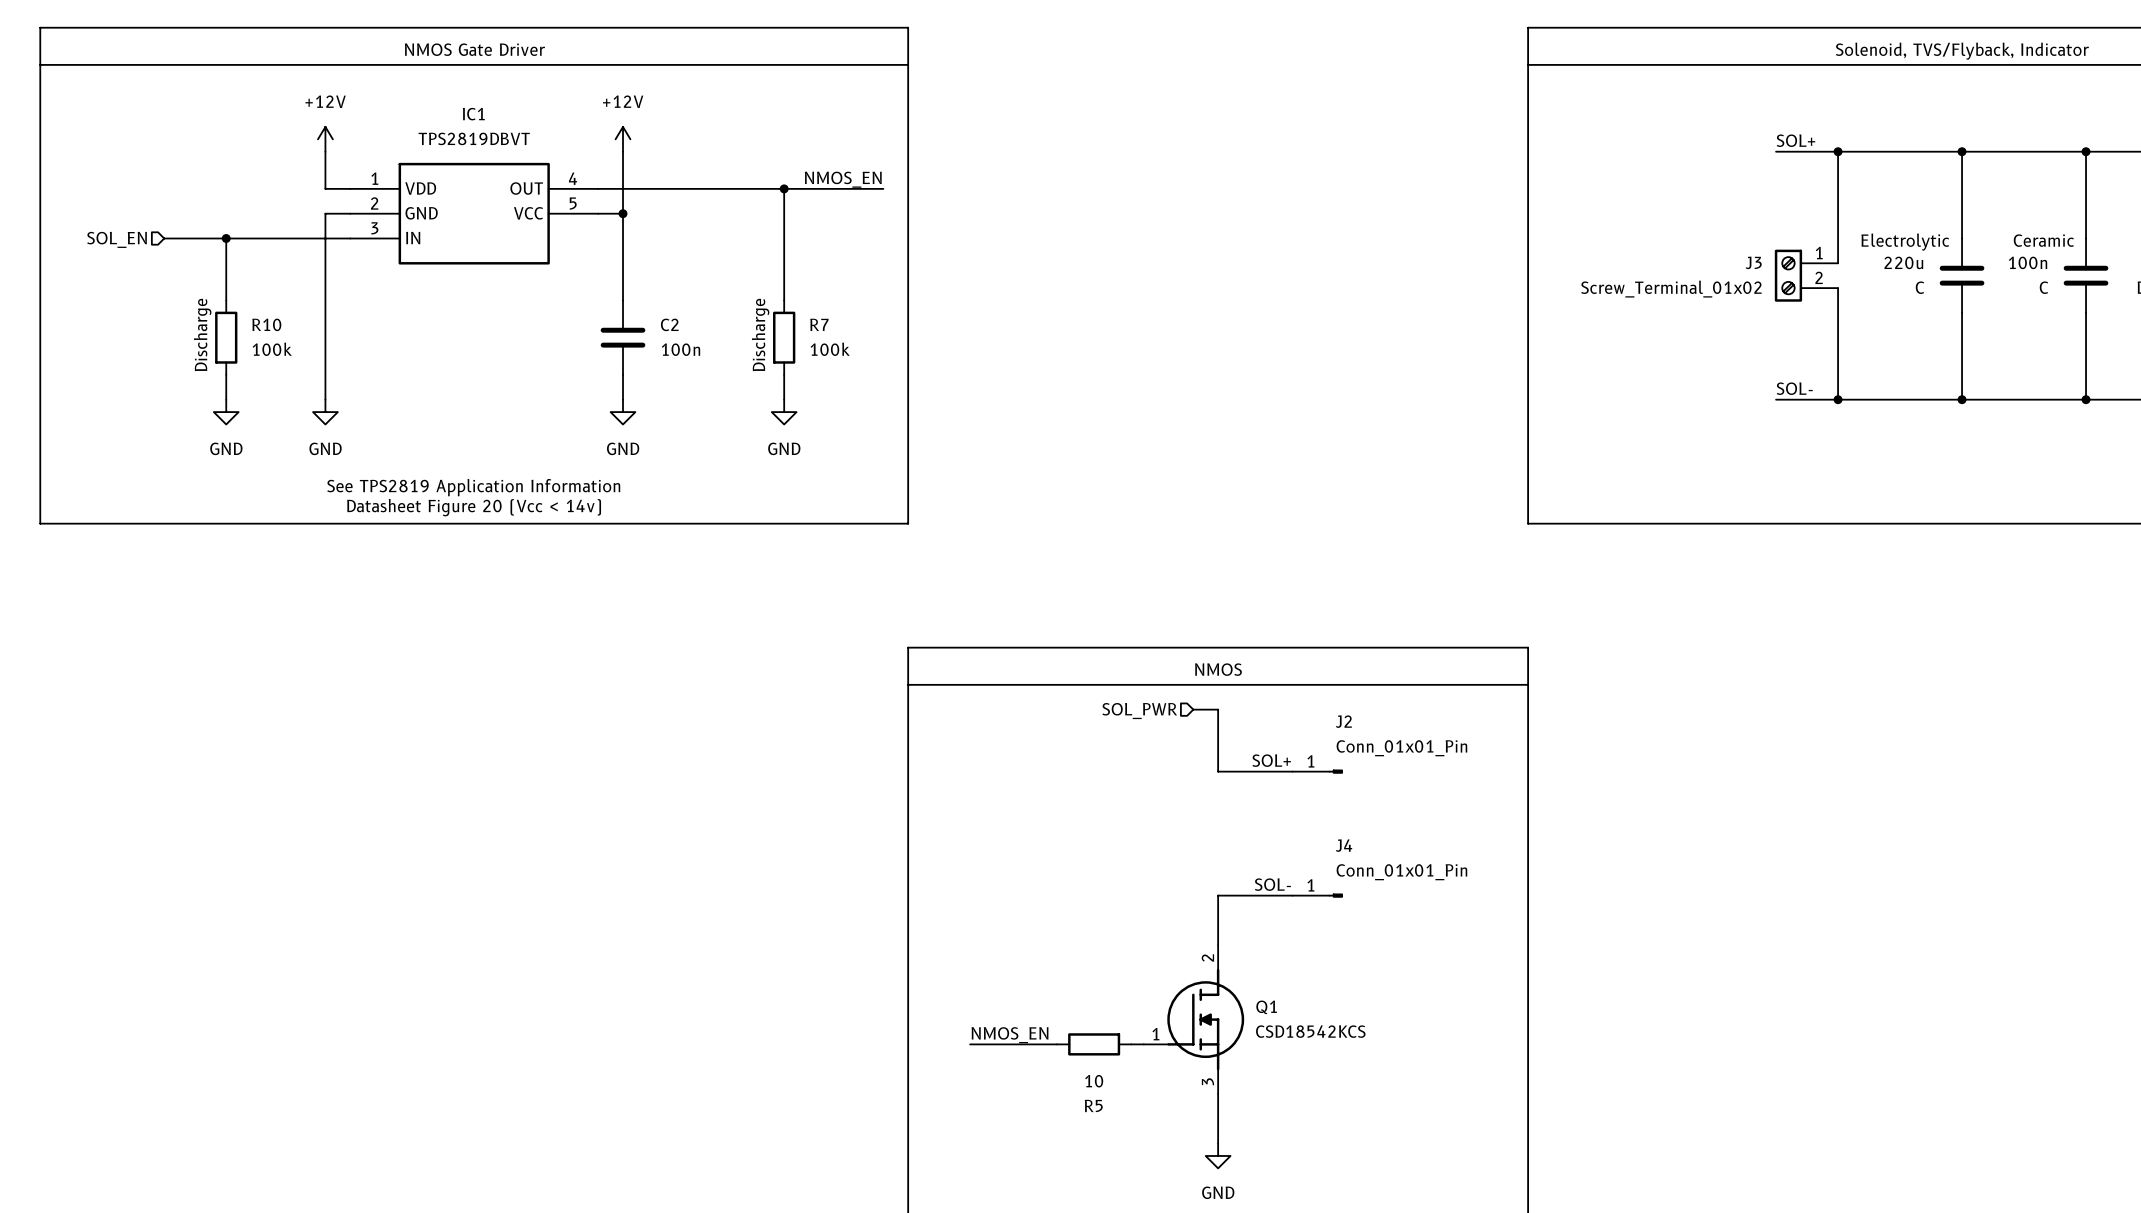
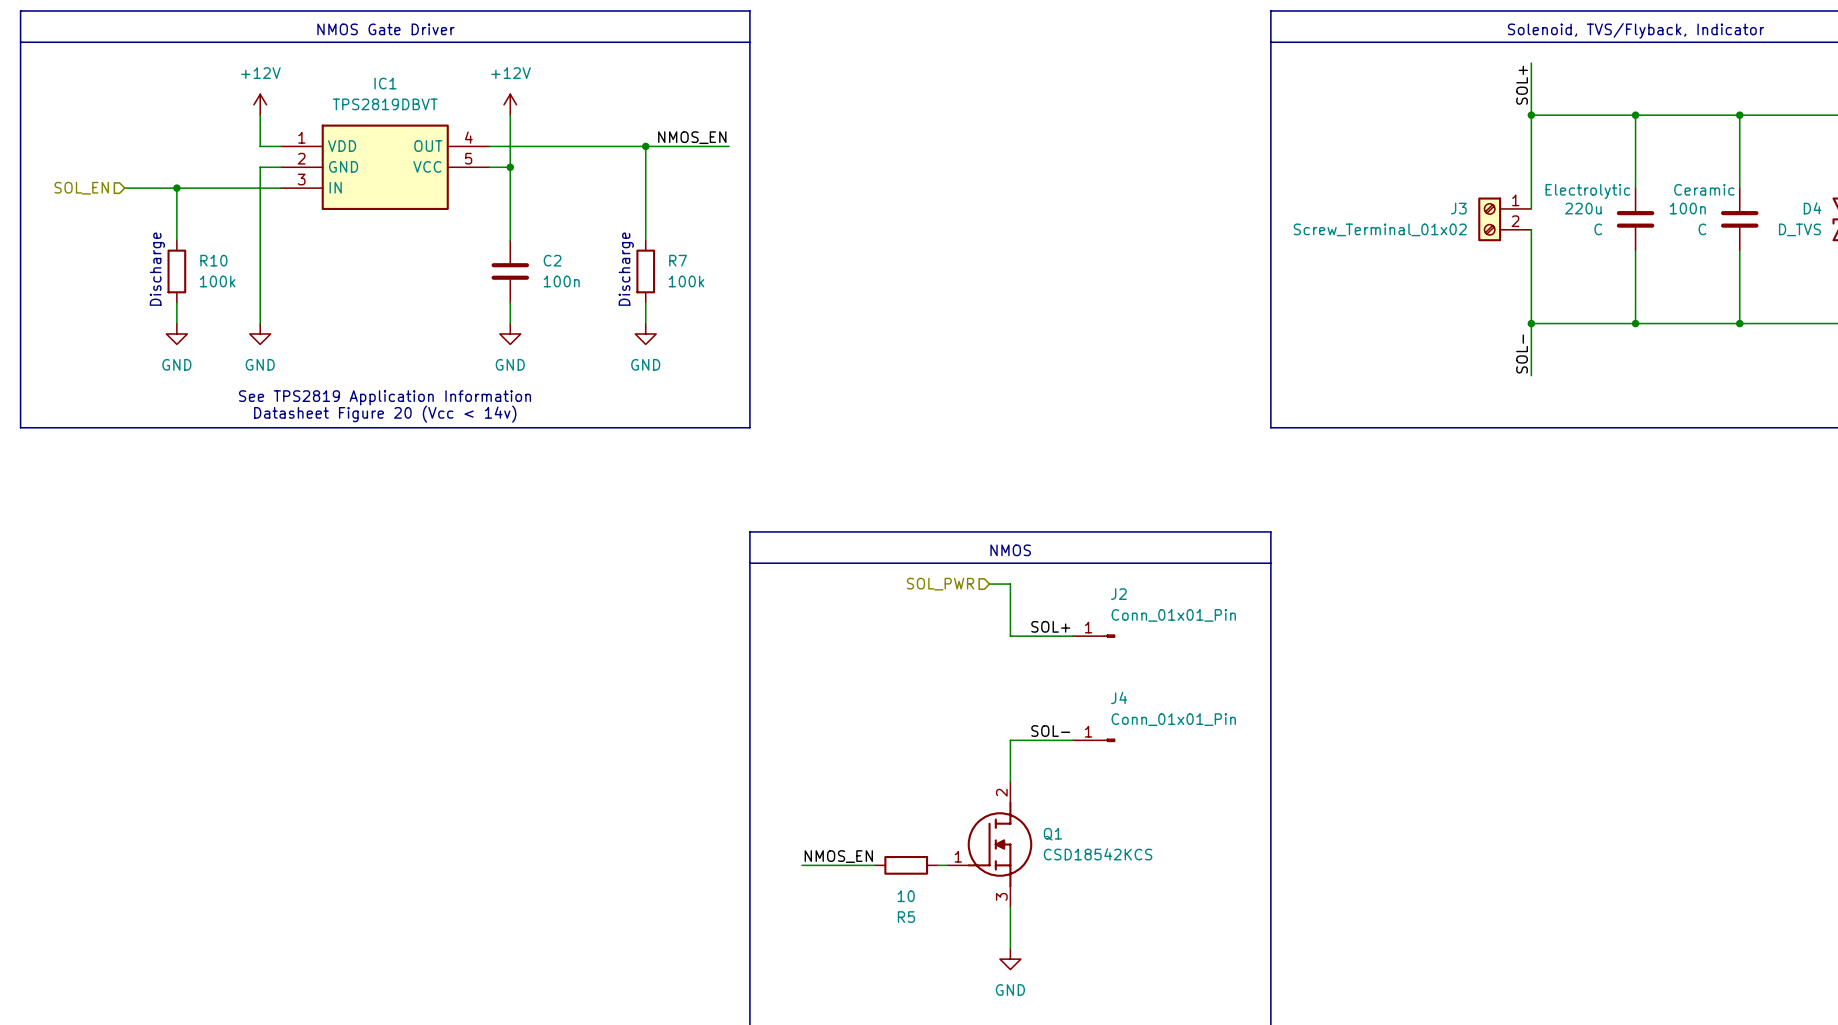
label rotation: 0° (1795, 140) -> 90° counterclockwise (1522, 85)
wire: (1776, 151) (1838, 151) -> (1531, 63) (1531, 115)
label rotation: 0° (1794, 388) -> 90° counterclockwise (1522, 354)
wire: (1776, 399) (1838, 399) -> (1531, 375) (1531, 323)

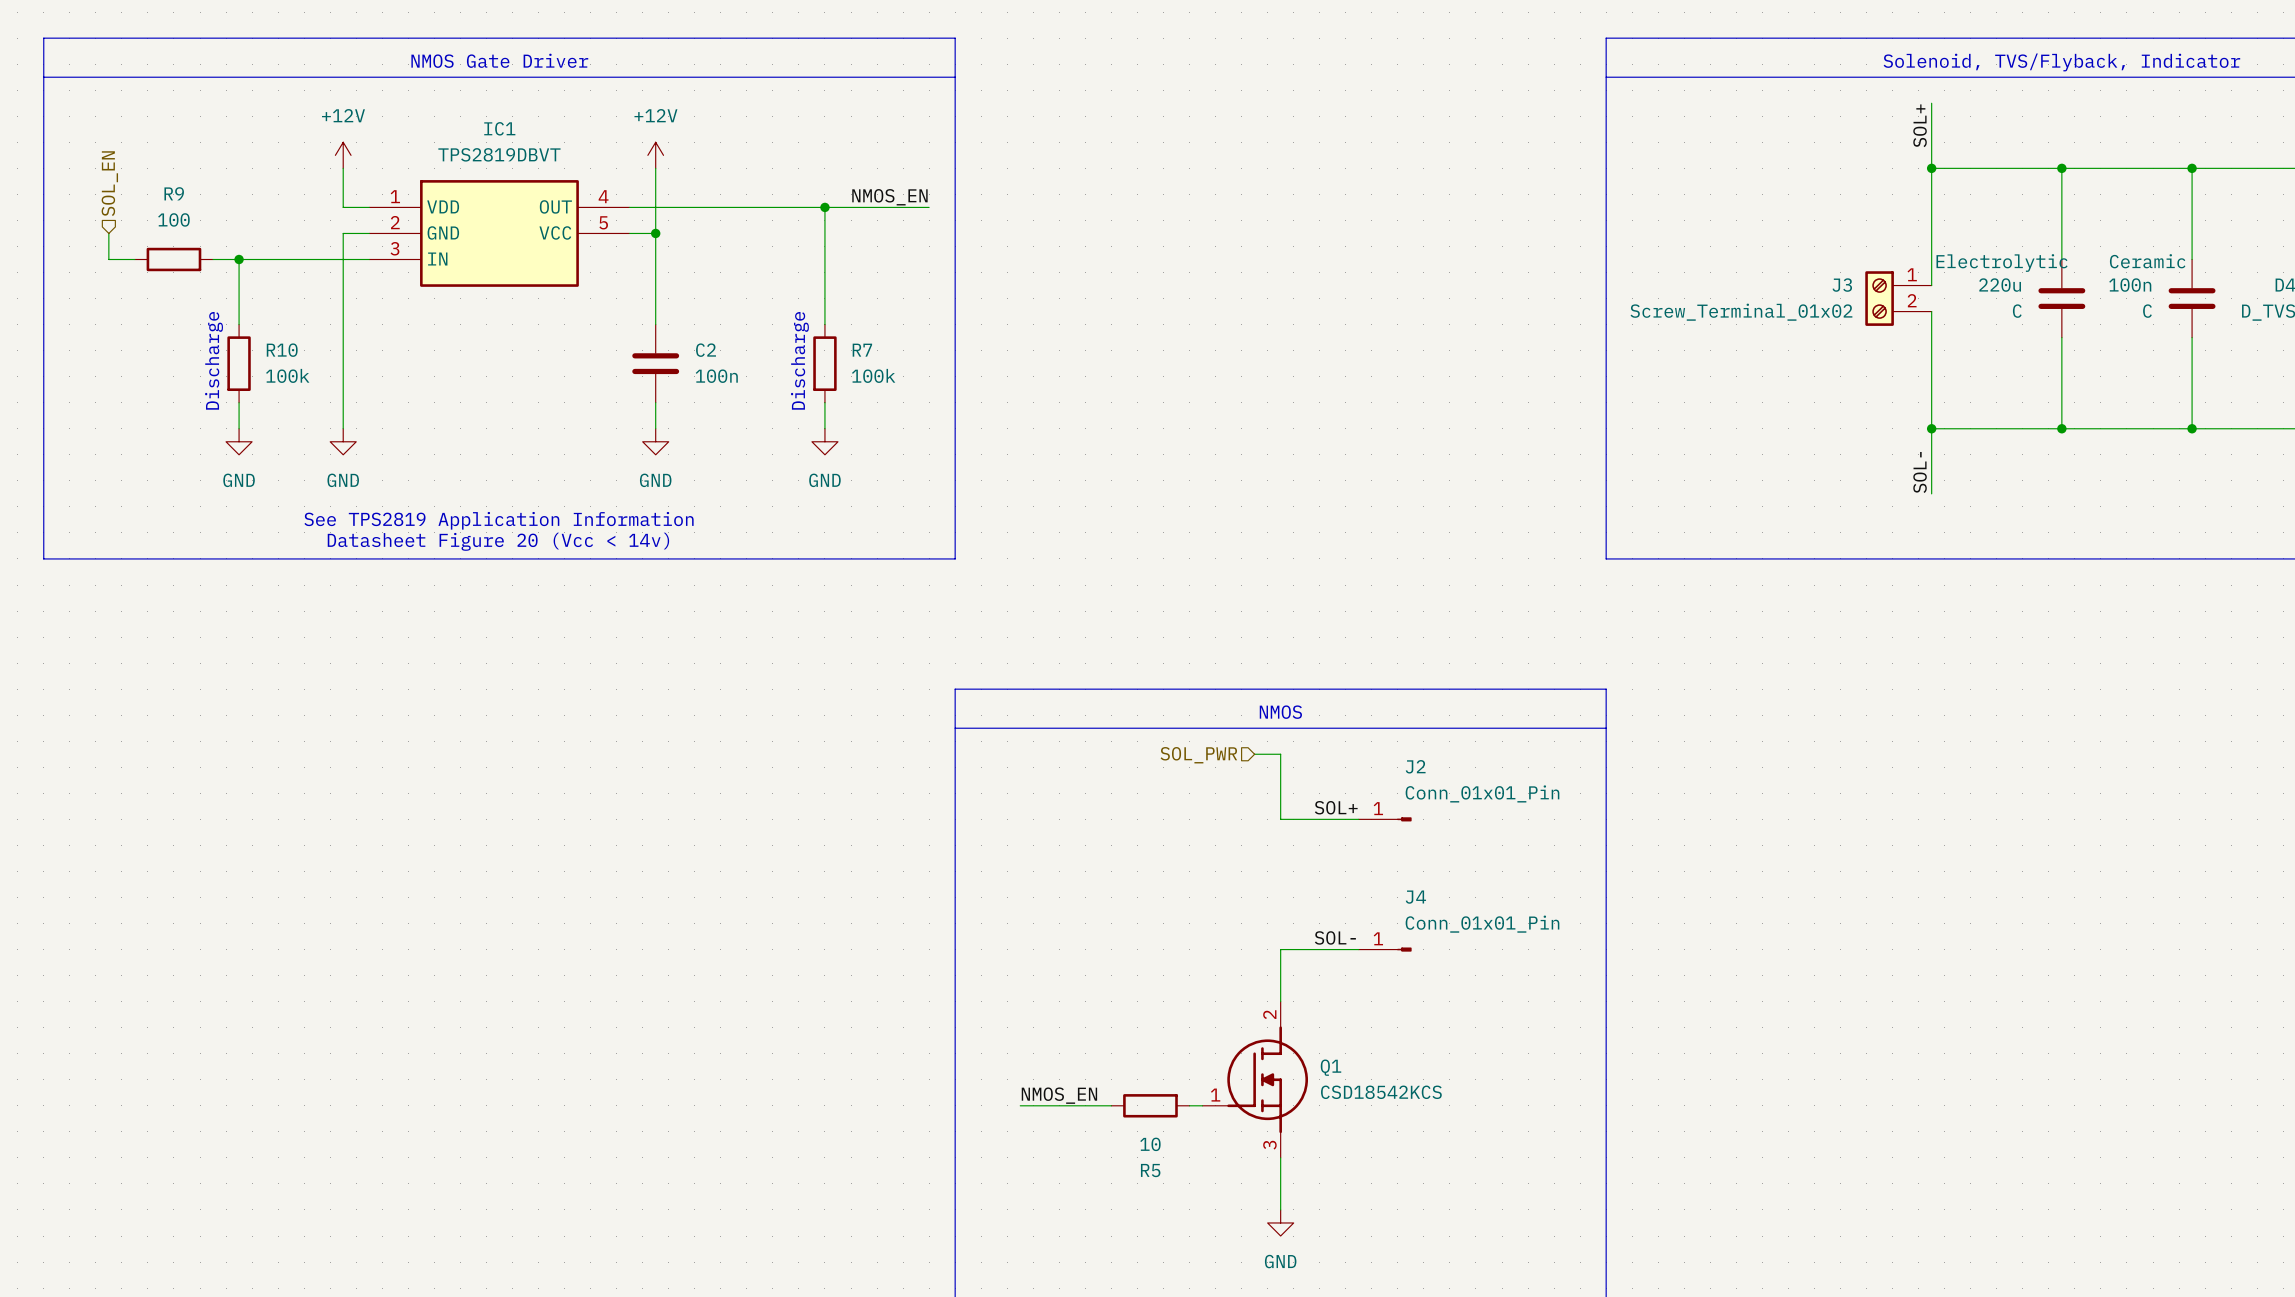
wire: none -> (108, 233) (108, 259) (134, 259)
hierarchical label rotation: 0° (81, 188) -> 90° clockwise (109, 183)
hierarchical label position: SOL_EN (81, 188) -> SOL_EN (109, 183)
wire: (124, 188) (156, 188) -> none
R9: none -> 100 (173, 259)

